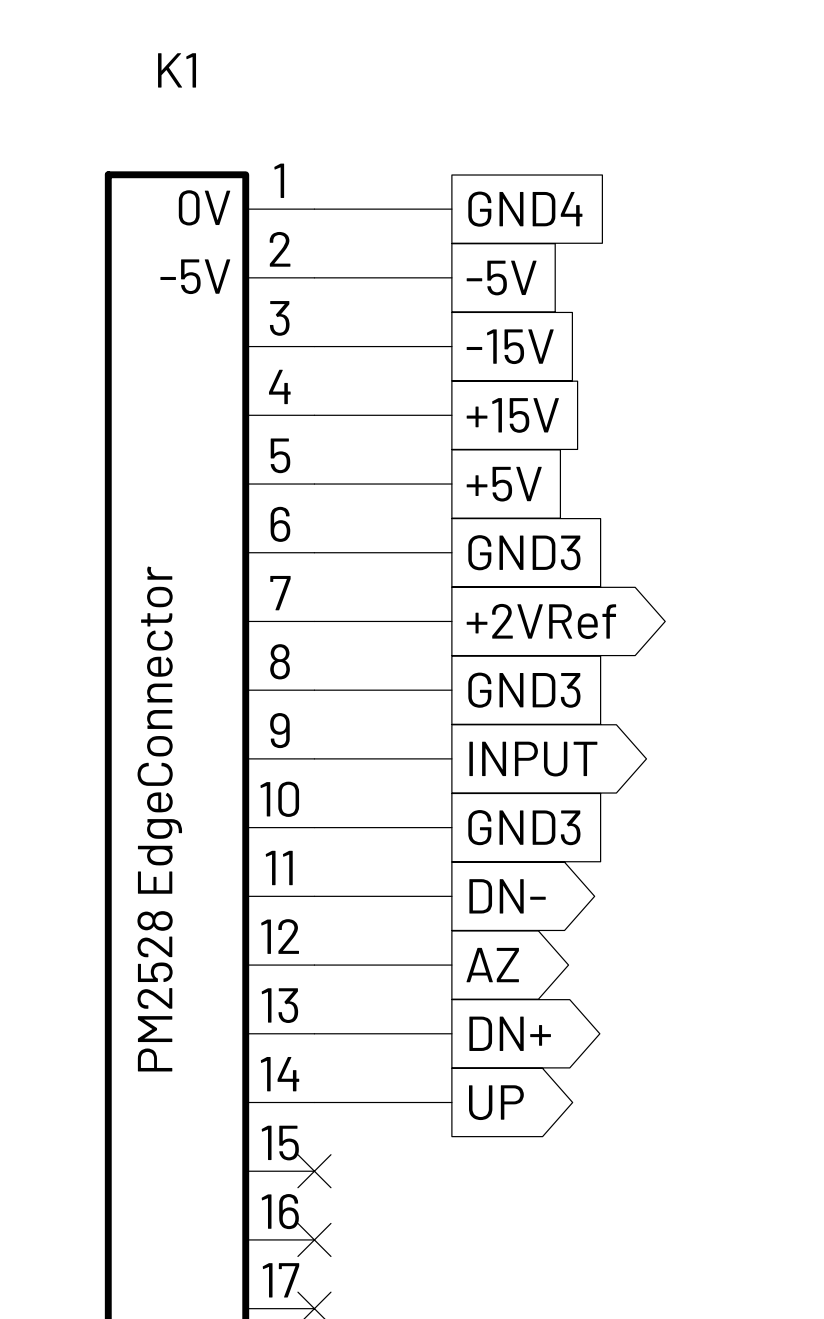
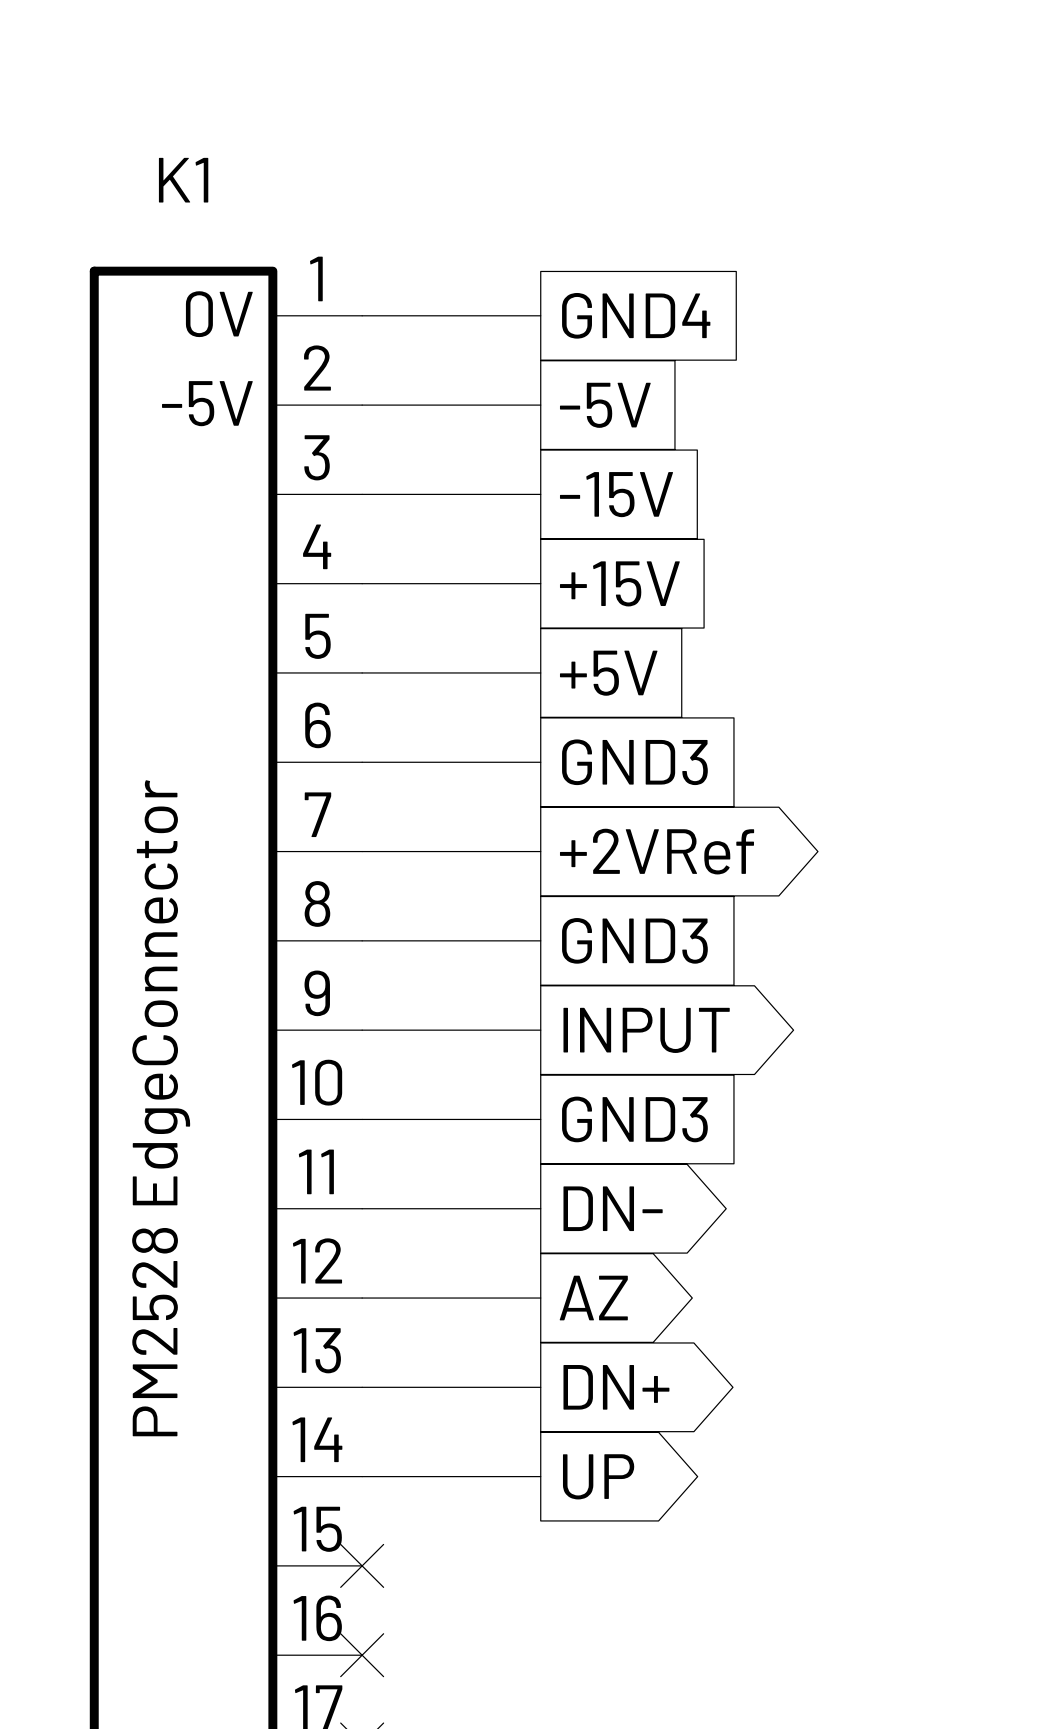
K1 name position: K1 (177, 70) -> K1 (183, 180)

